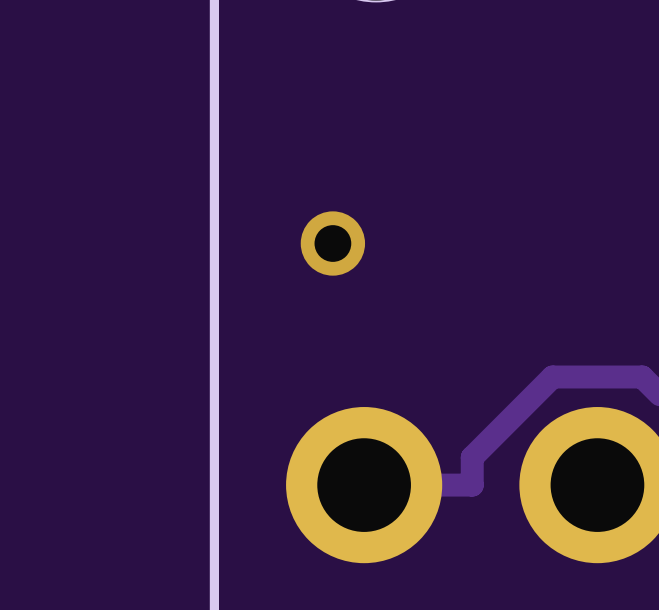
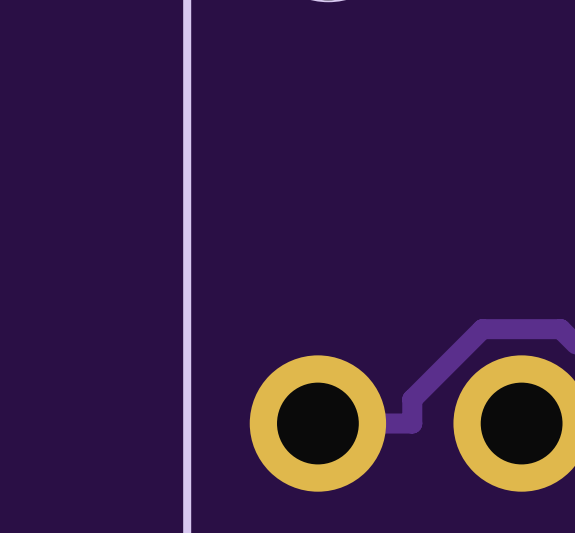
via: (332, 243) -> none

